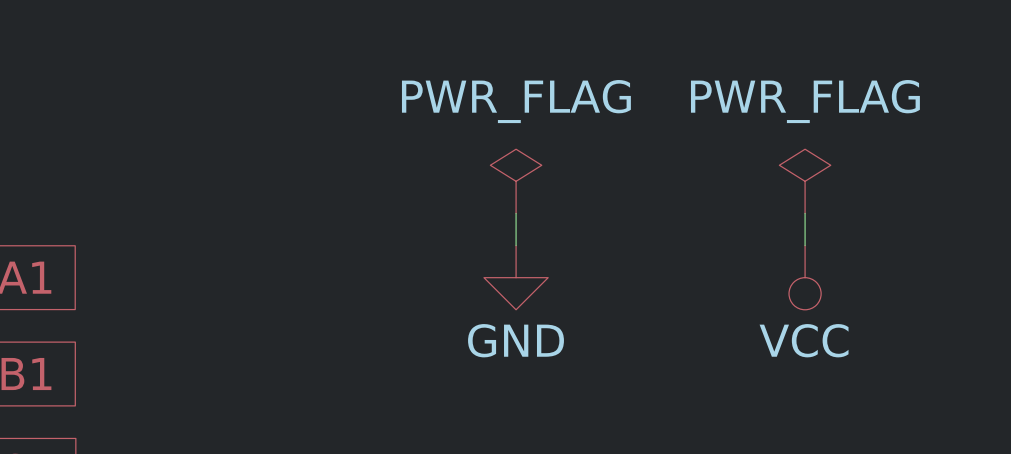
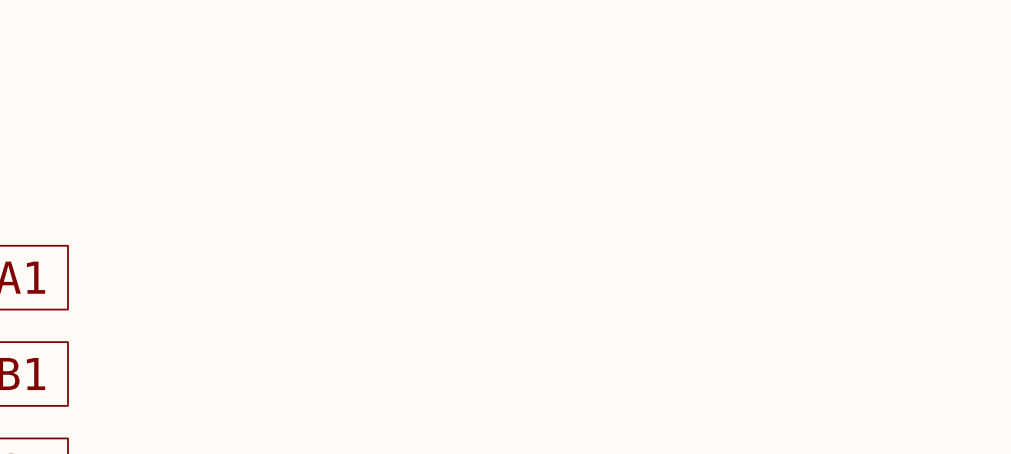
power symbol: PWR_FLAG (516, 181) -> none
power symbol: PWR_FLAG (805, 181) -> none
wire: (516, 213) (516, 245) -> none
wire: (805, 213) (805, 245) -> none
power symbol: GND (516, 277) -> none
power symbol: VCC (805, 277) -> none

